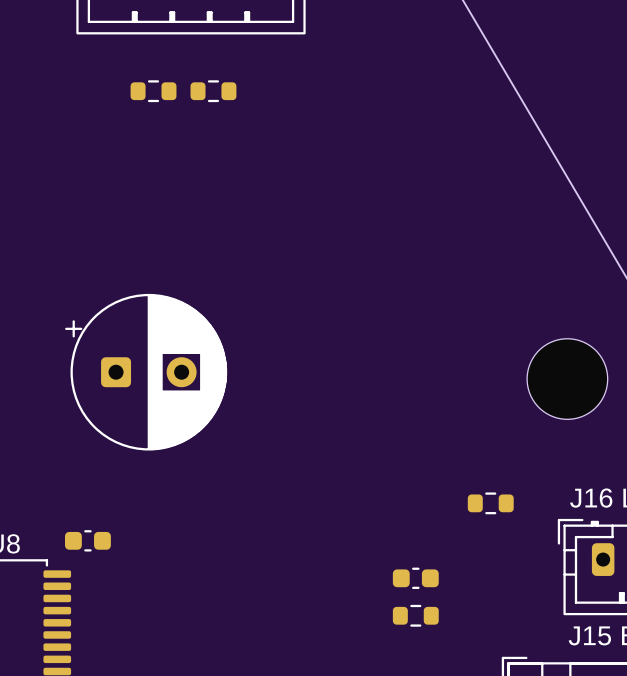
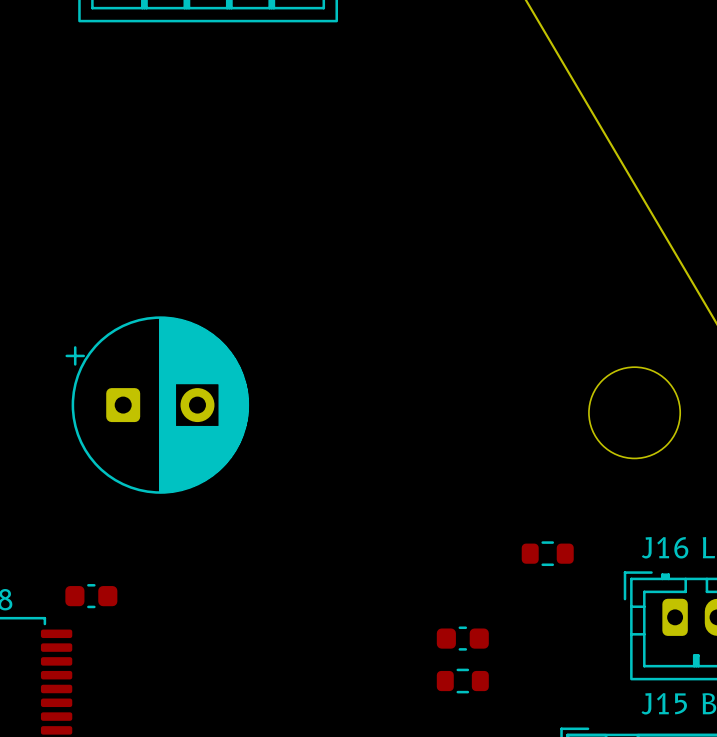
part: (153, 91) -> none
part: (213, 91) -> none

